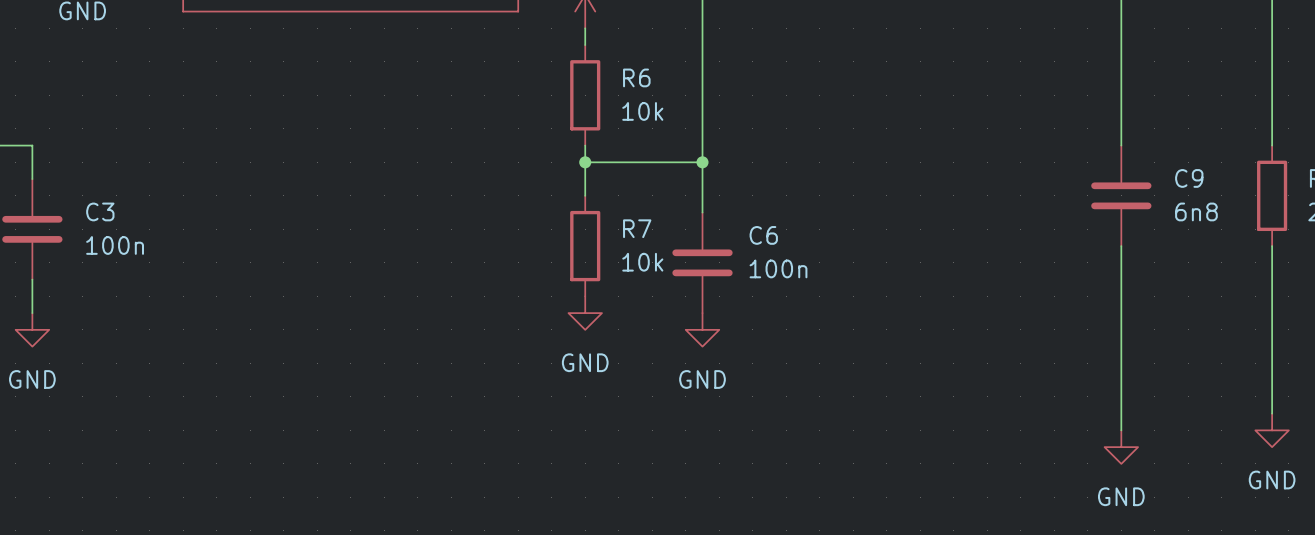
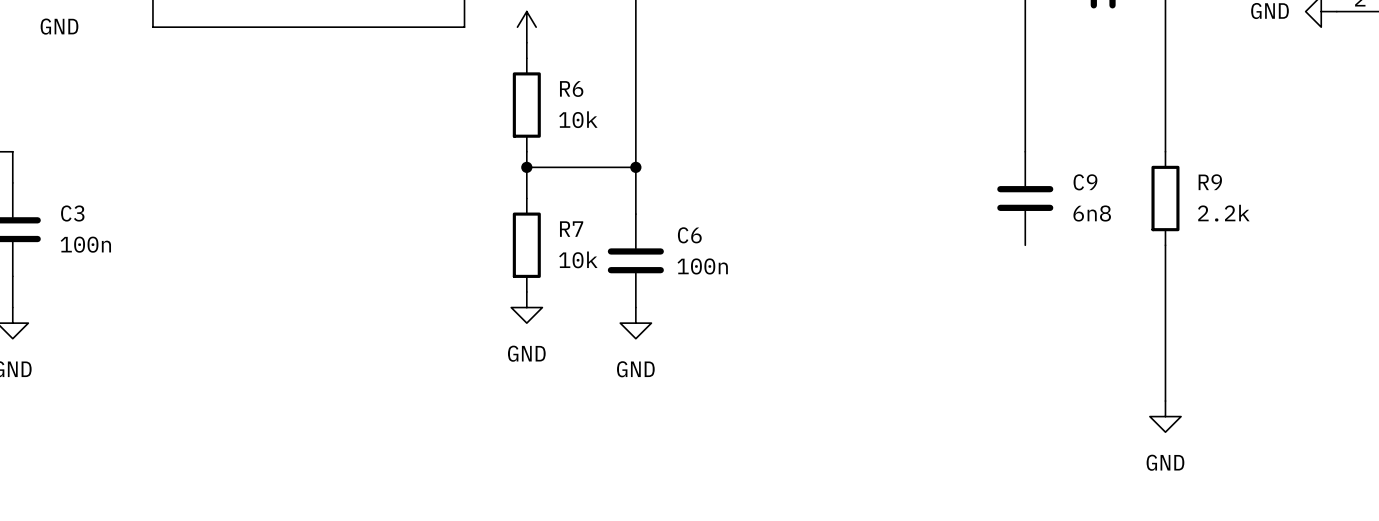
wire: (1121, 246) (1121, 430) -> none
power symbol: GND (1121, 447) -> none

